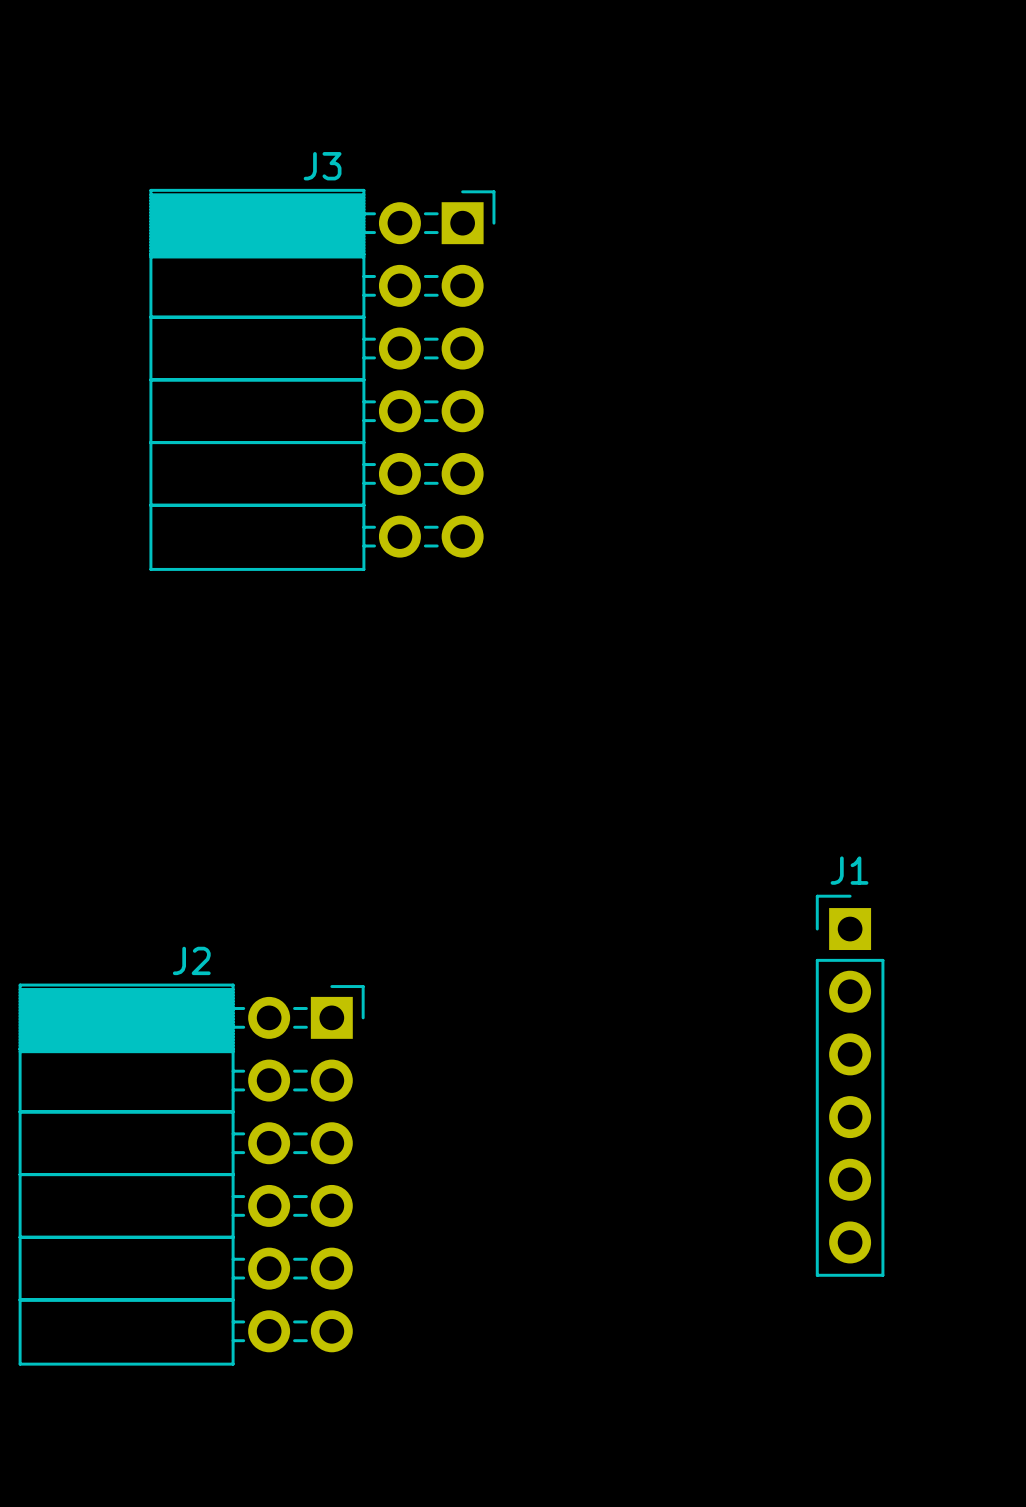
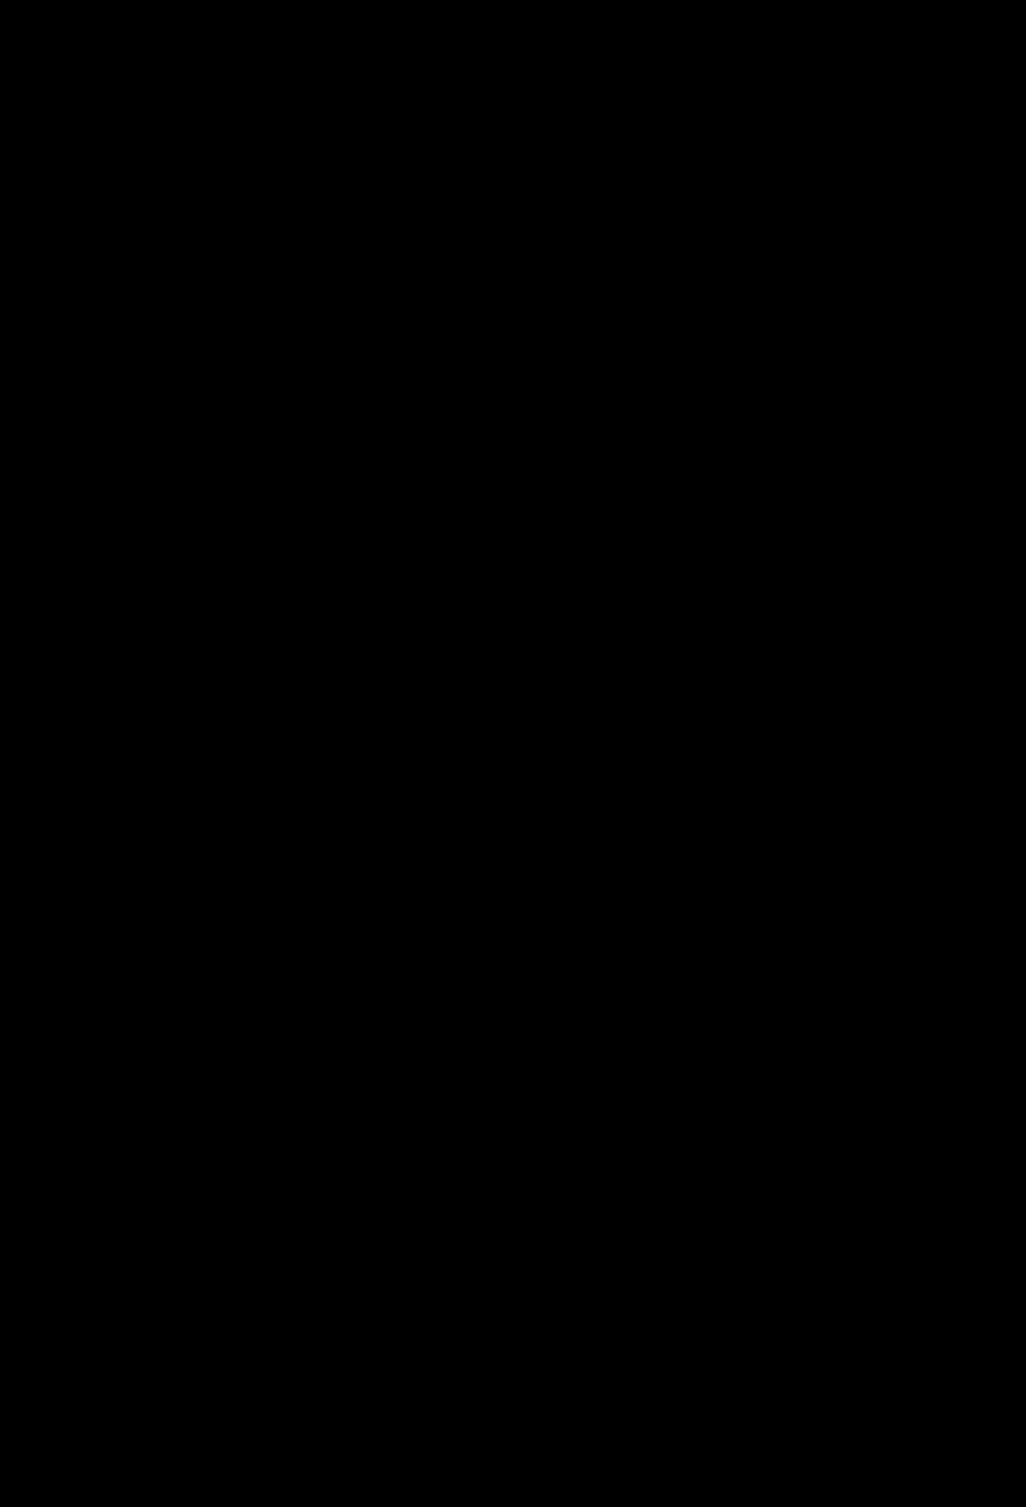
J3: (322, 379) -> none
J1: (850, 1085) -> none
J2: (191, 1174) -> none

